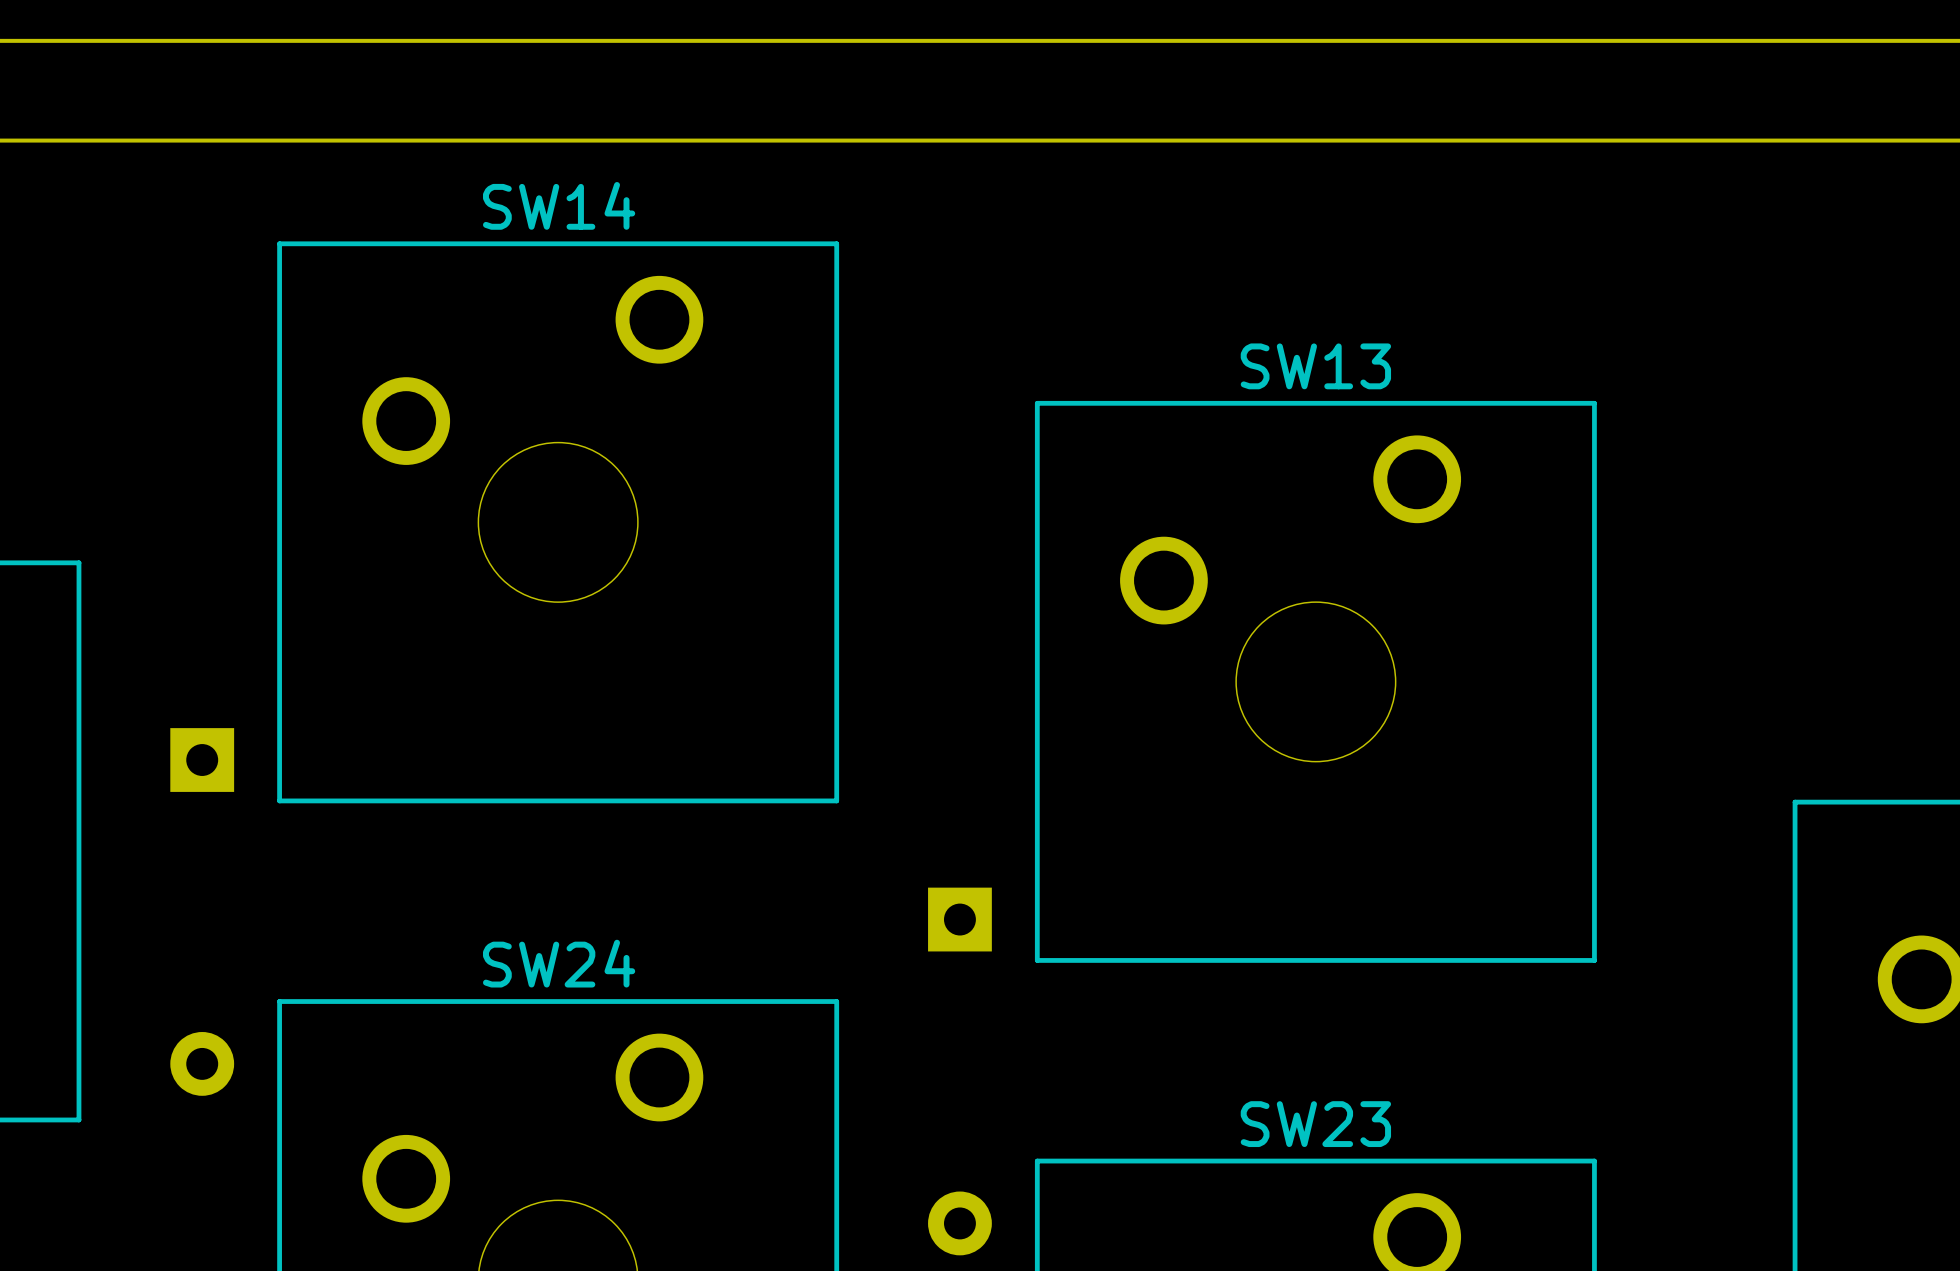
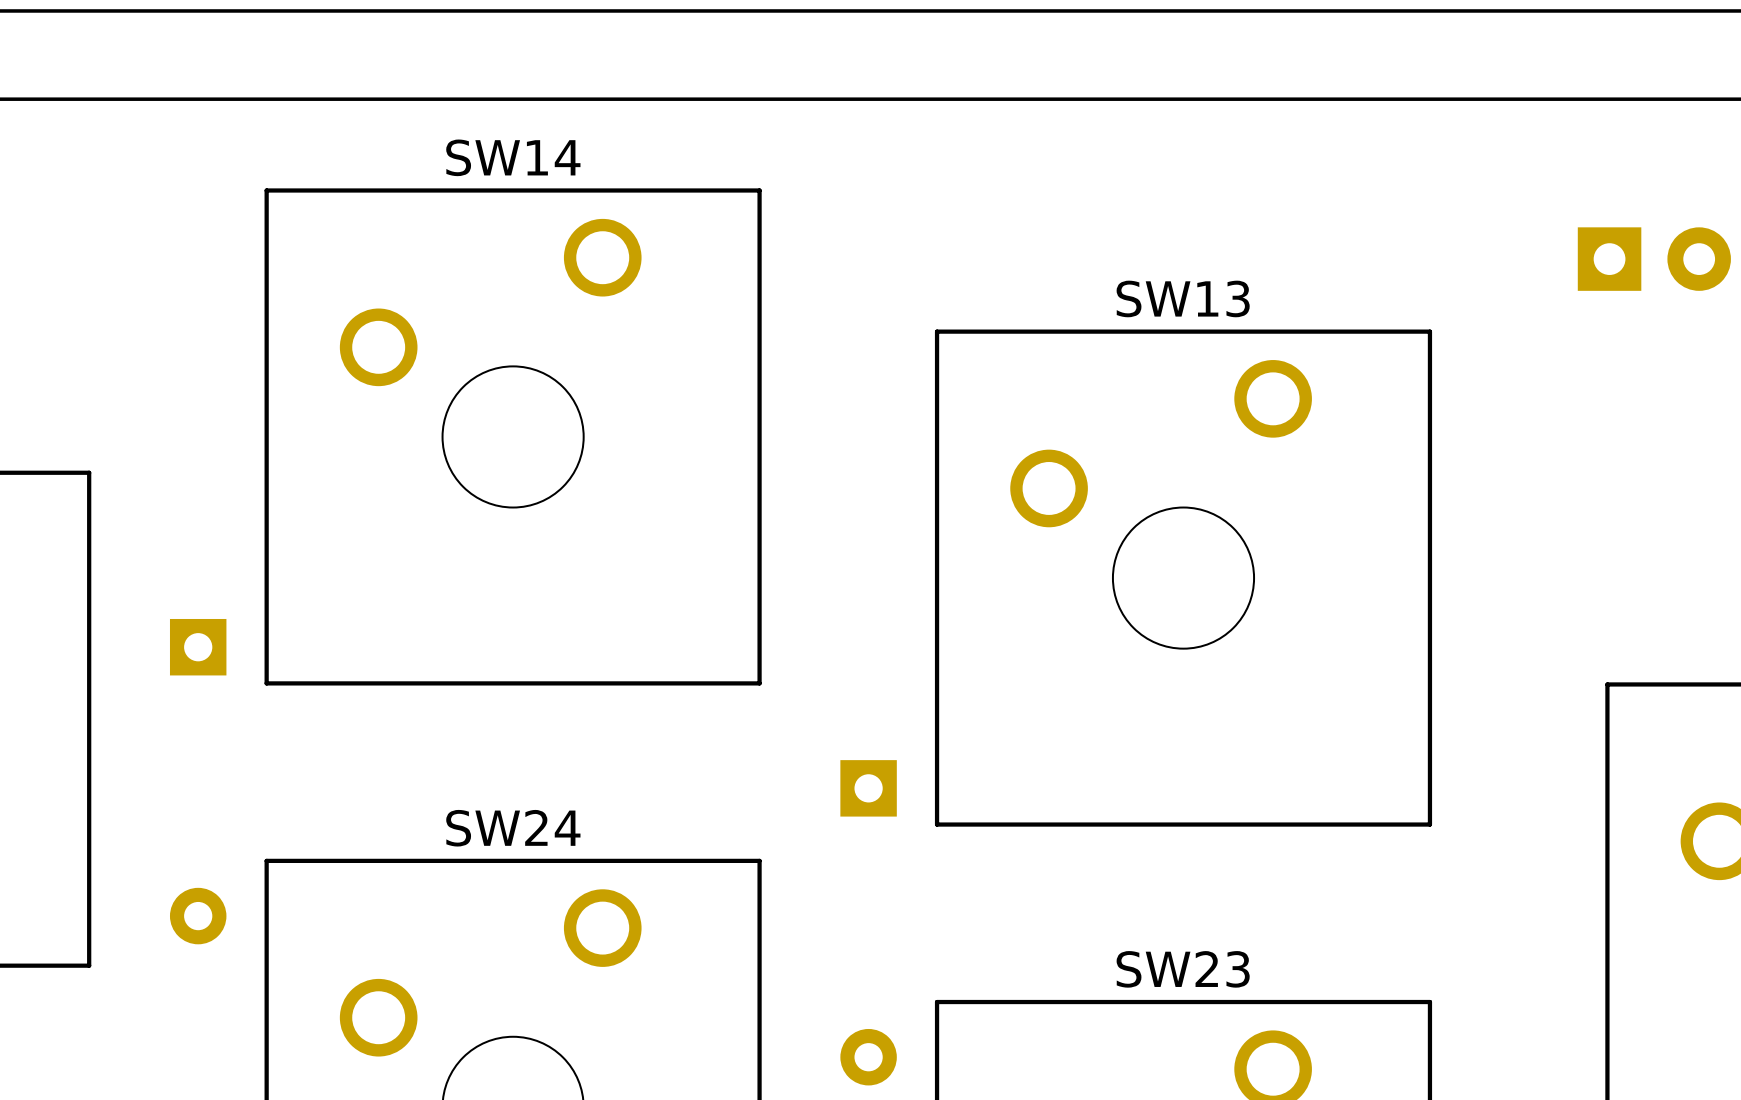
part: none -> (1654, 259)

